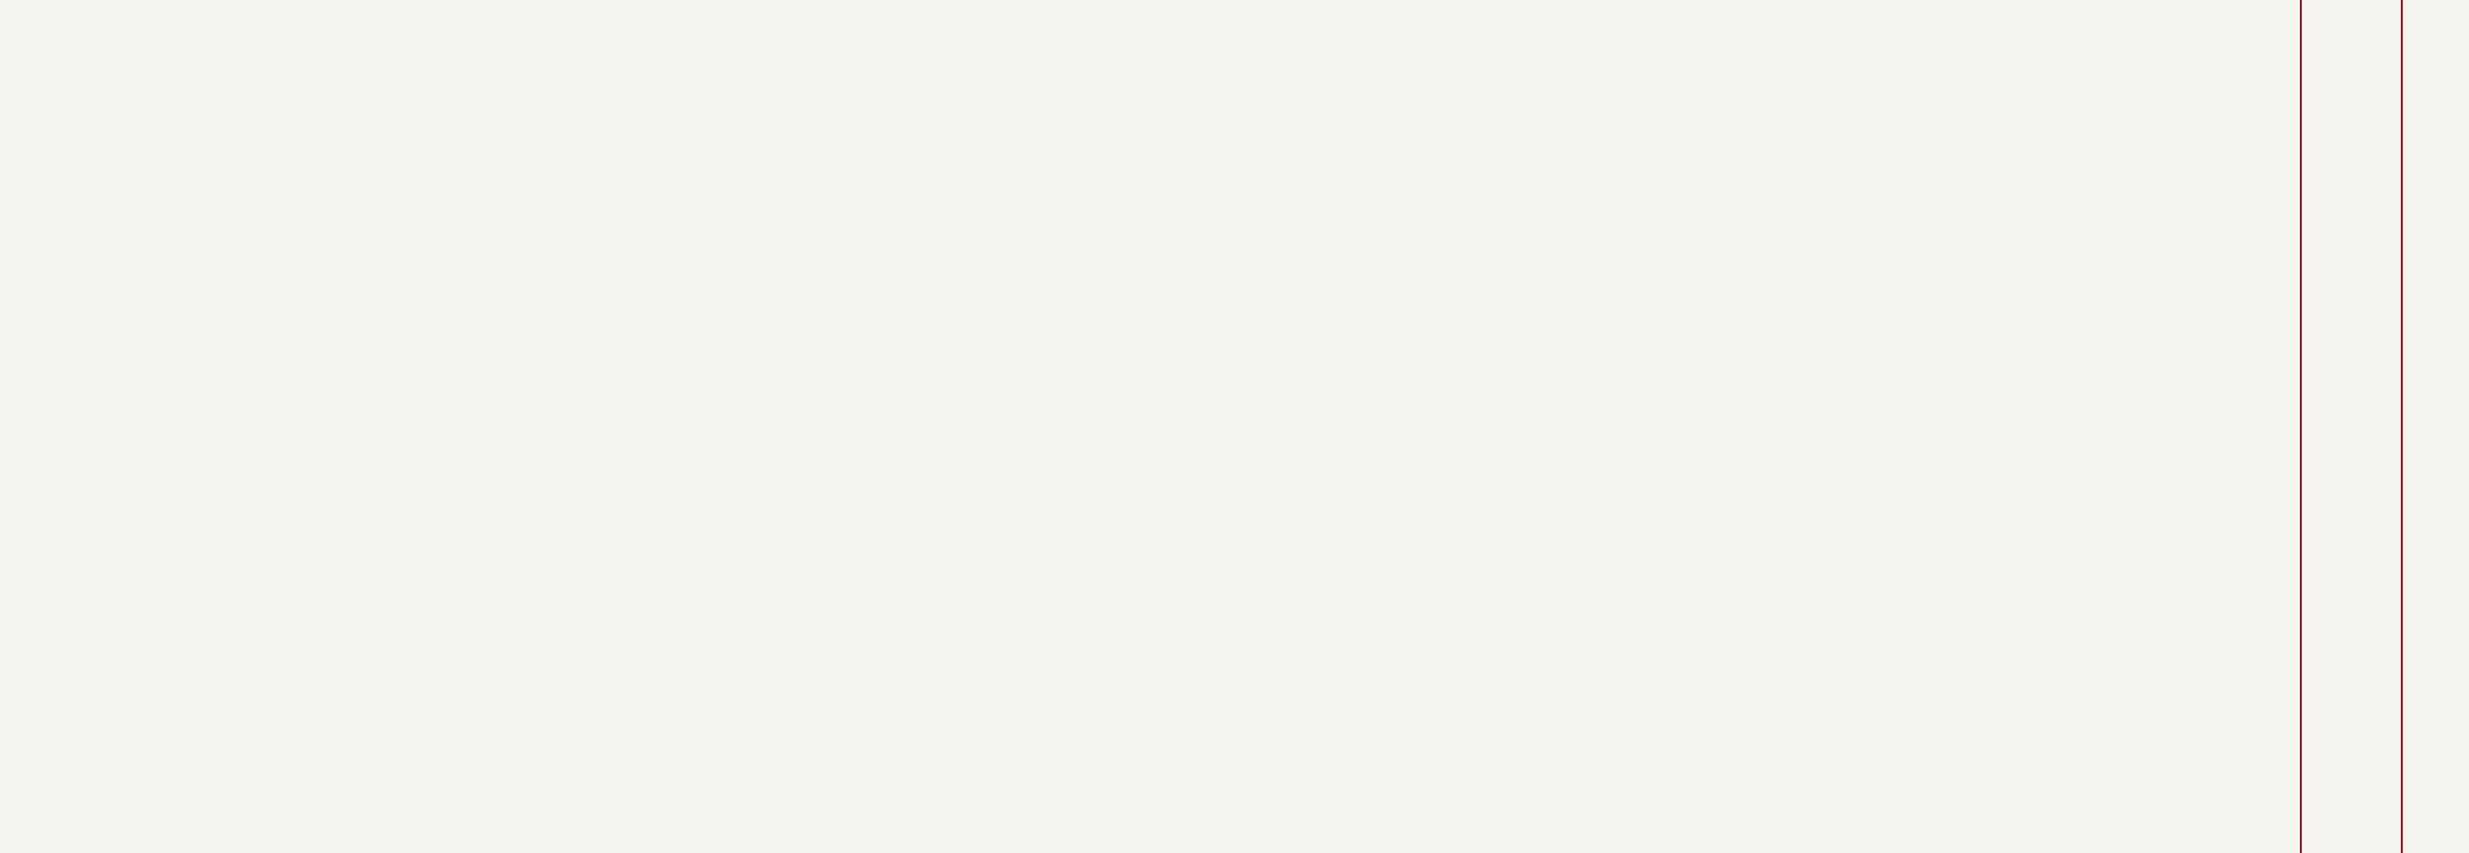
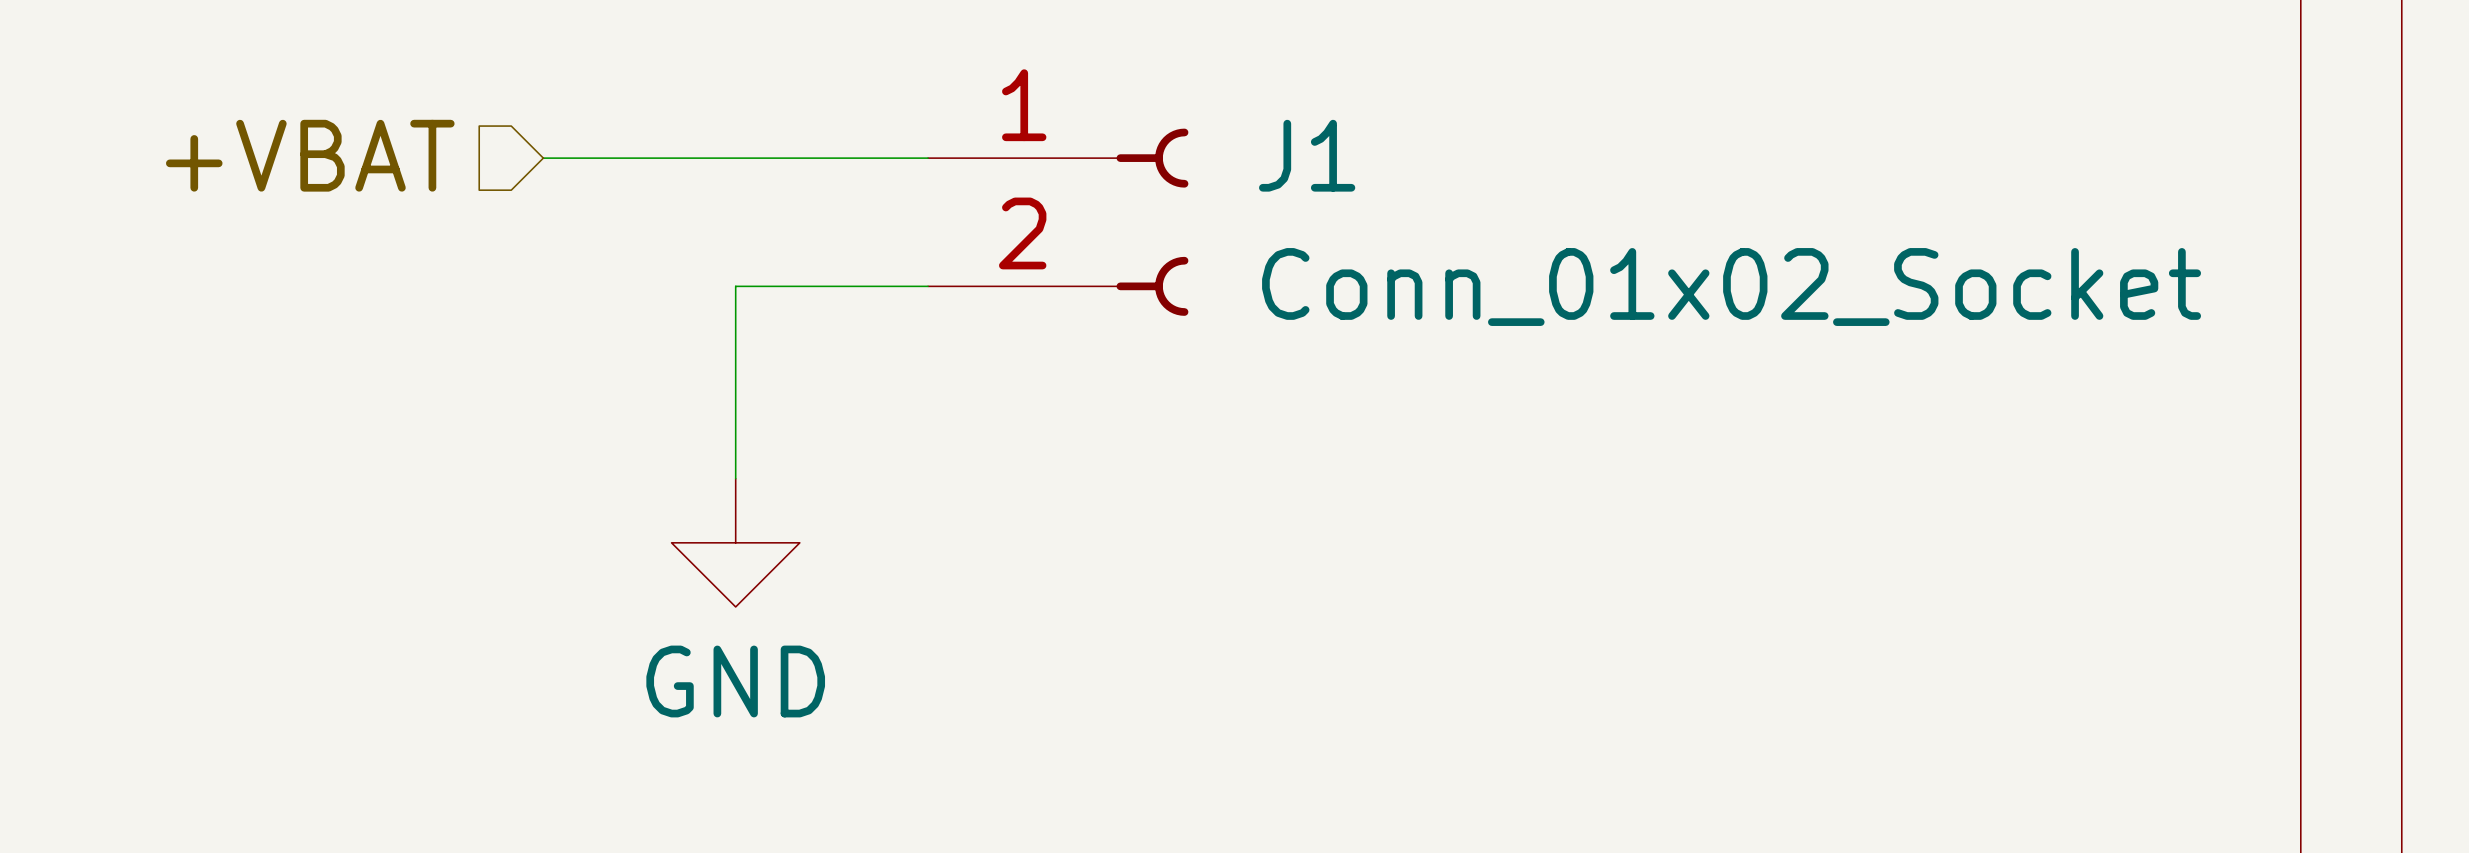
hierarchical label: none -> +VBAT (310, 155)
wire: none -> (543, 158) (928, 158)
J1: none -> Conn_01x02_Socket (1058, 222)
wire: none -> (928, 286) (735, 286) (735, 478)
power symbol: none -> GND (735, 542)

